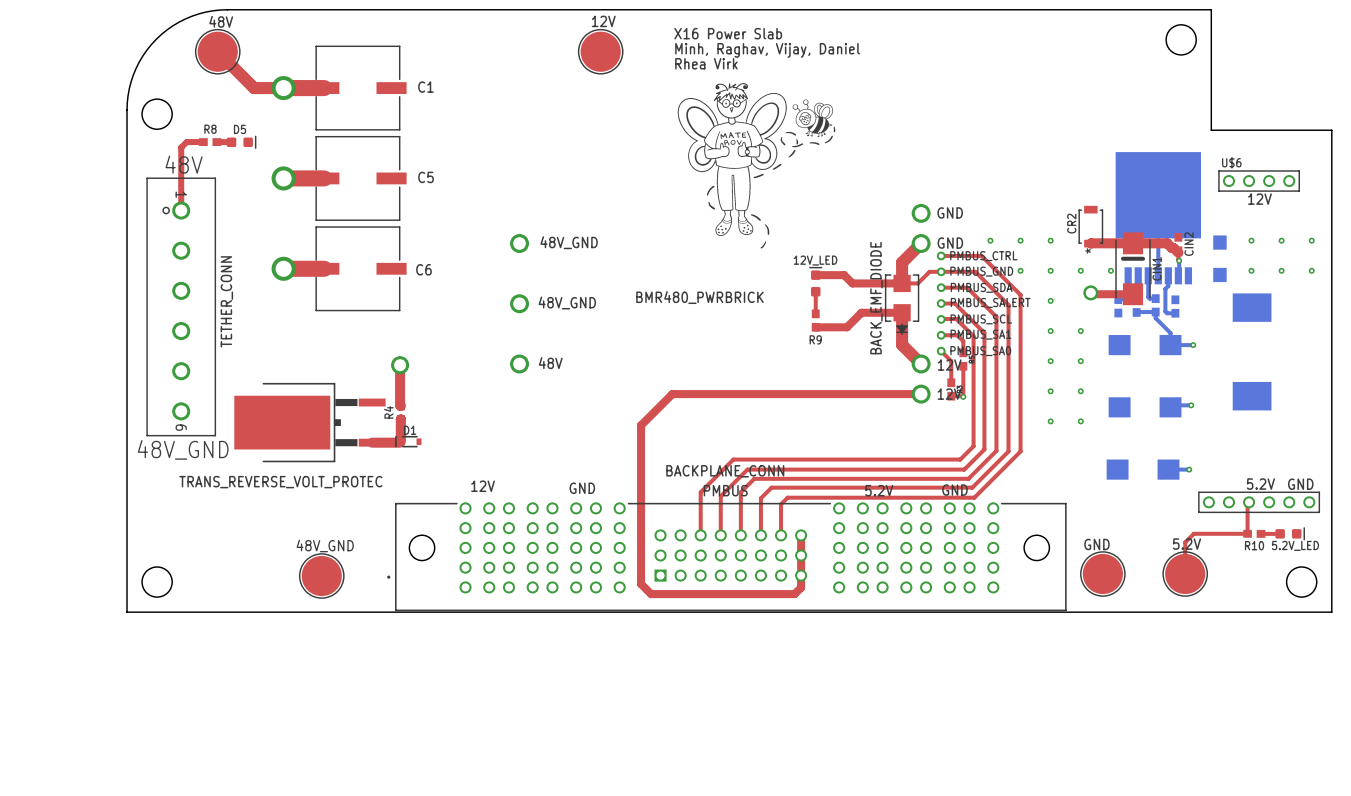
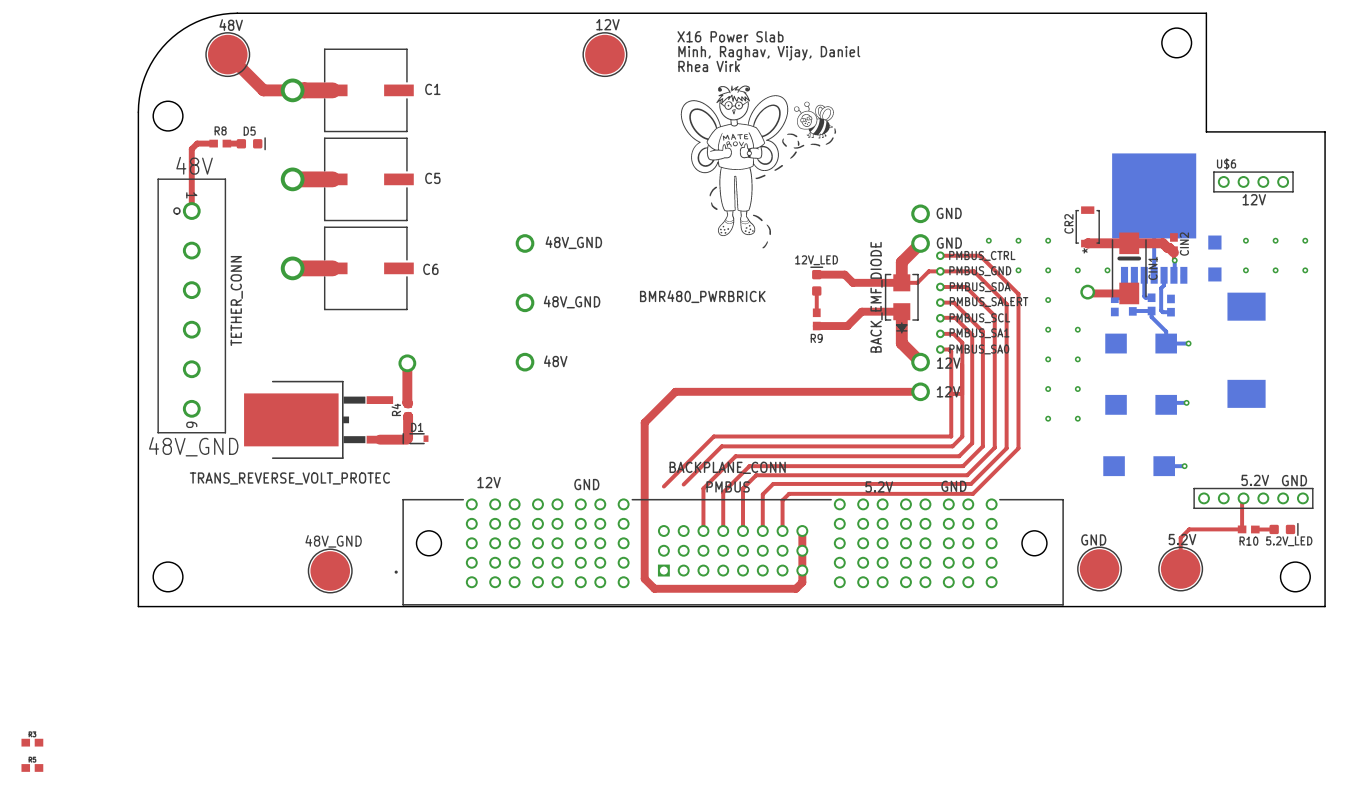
top track: (954, 335) (957, 335) (963, 341) (963, 352) -> (953, 333) (962, 342) (962, 436) (952, 446) (721, 446) (683, 484)
top track: (941, 351) (951, 361) (951, 382) -> (940, 349) (949, 349) (951, 351) (951, 436) (713, 436) (663, 486)
part rotation: 0° (963, 359) -> 90° clockwise (32, 767)
part position: (963, 359) -> (32, 767)
part rotation: 0° (951, 389) -> 90° clockwise (32, 742)
part position: (951, 389) -> (32, 742)
via: (963, 396) -> none

